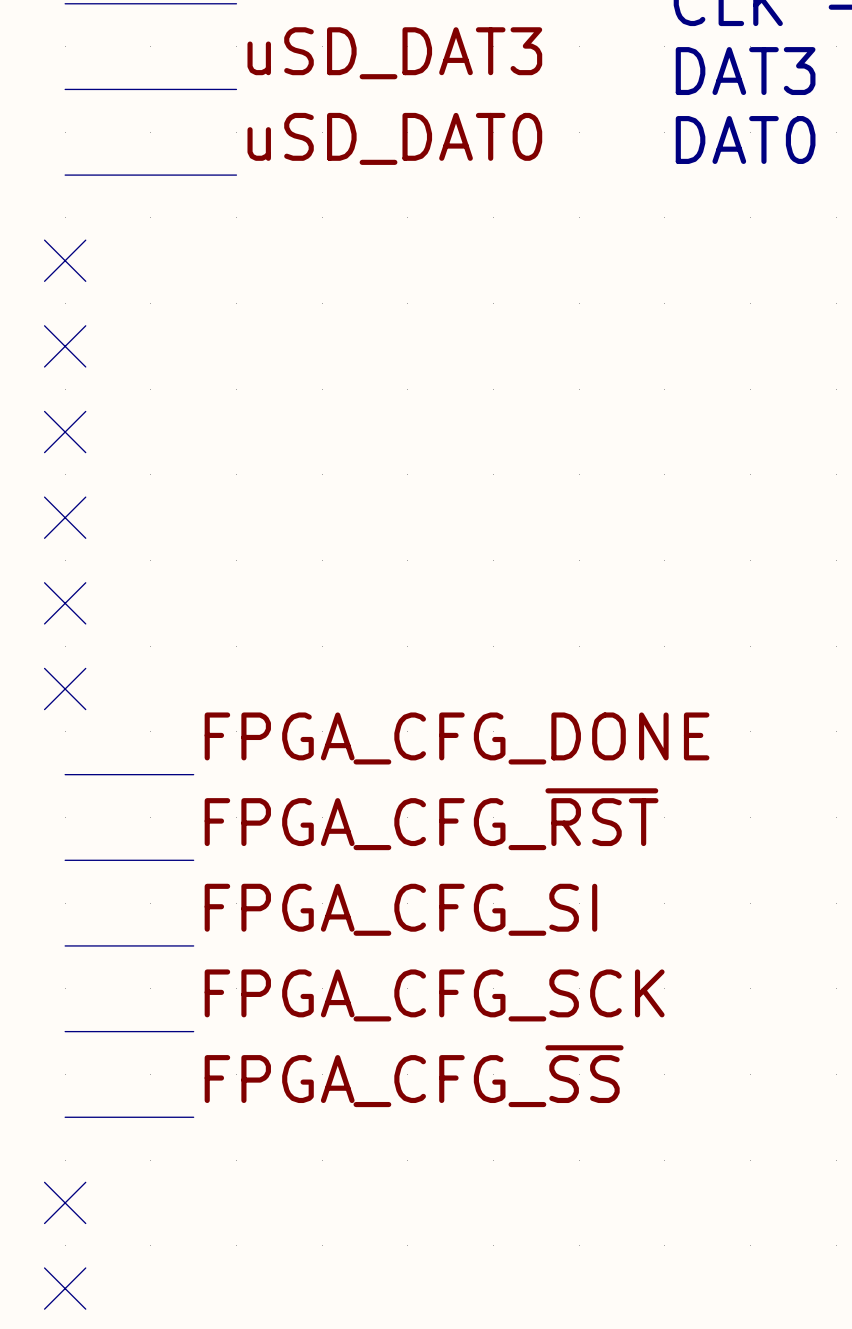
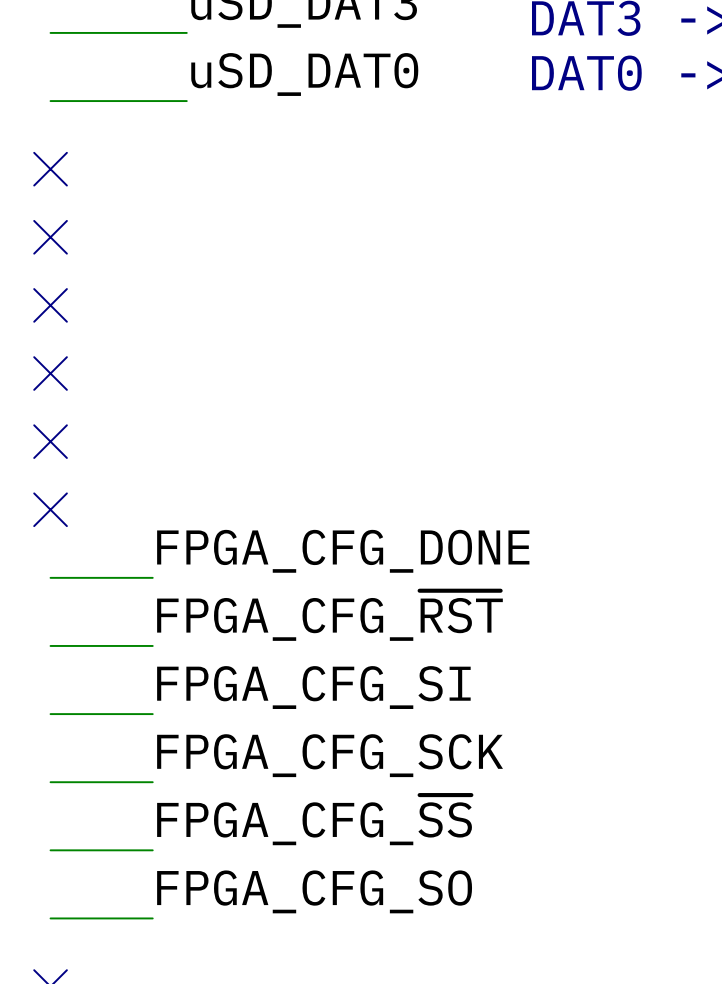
label: none -> FPGA_CFG_SO (314, 891)
wire: none -> (50, 918) (152, 918)
no-connect mark: (65, 1202) -> none

